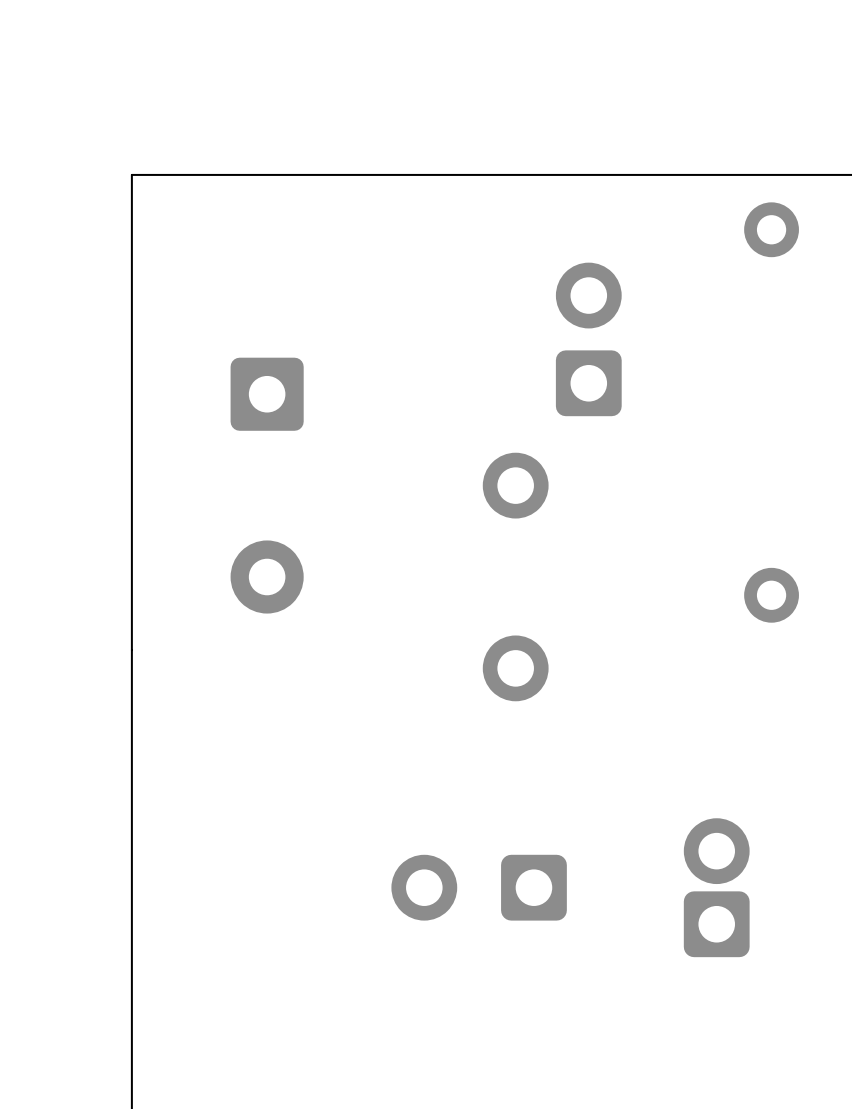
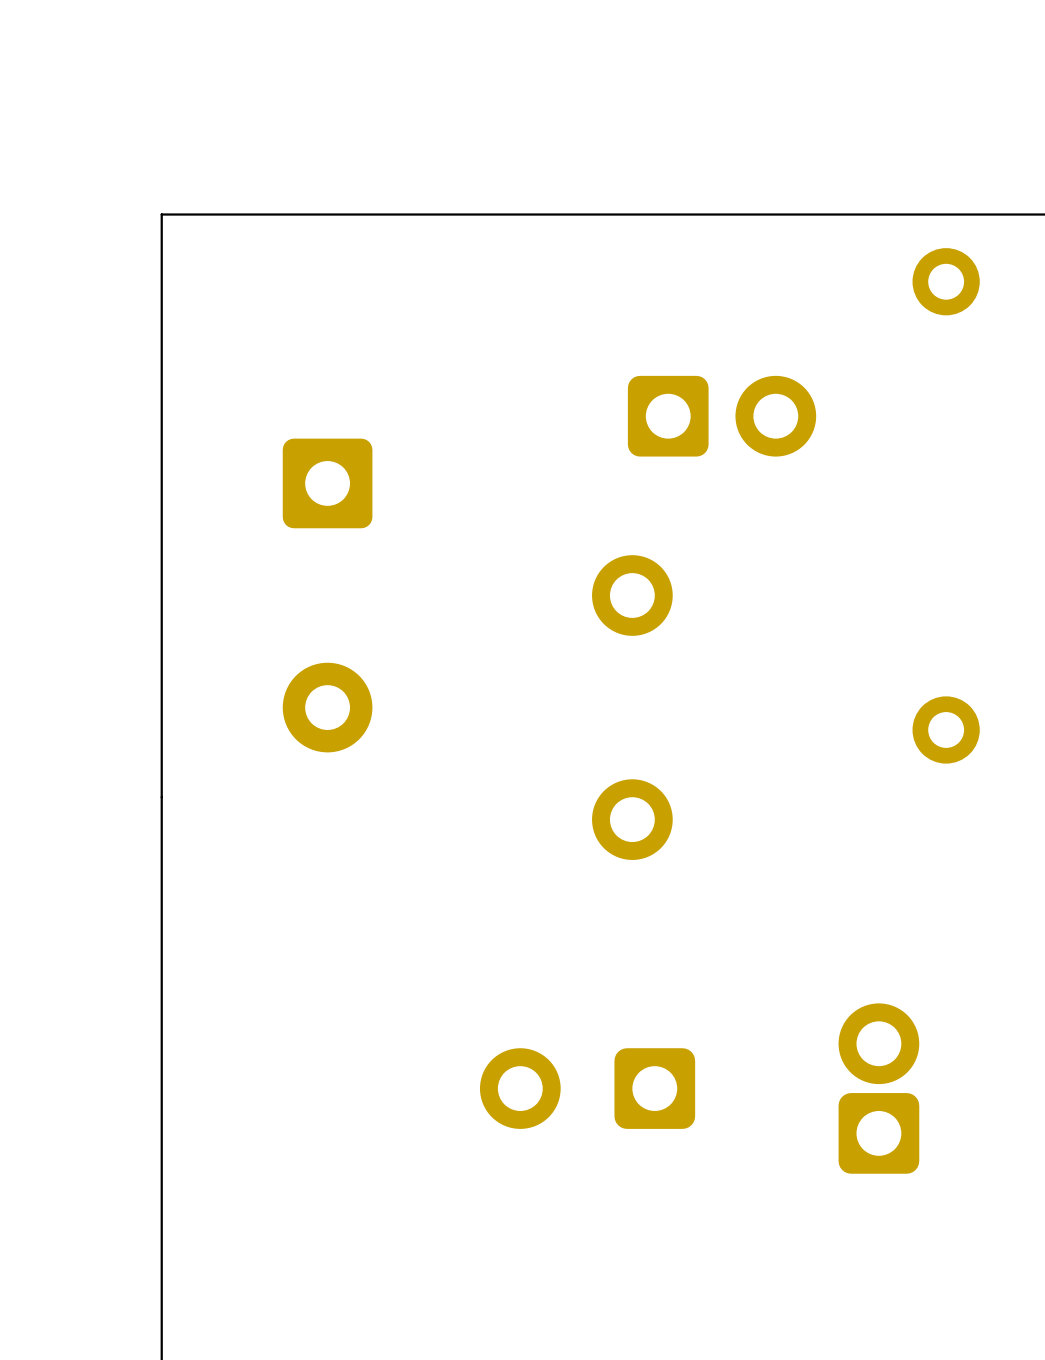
part rotation: 0° (588, 339) -> 90° clockwise (722, 416)

